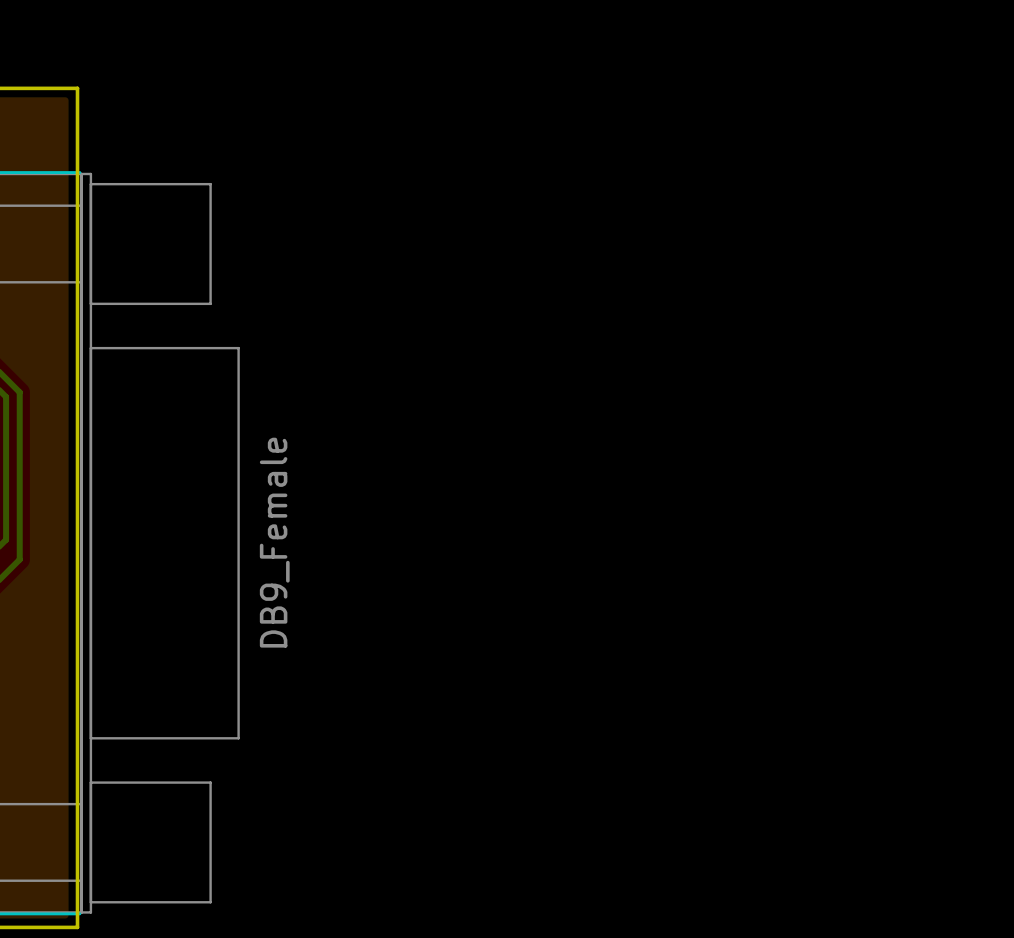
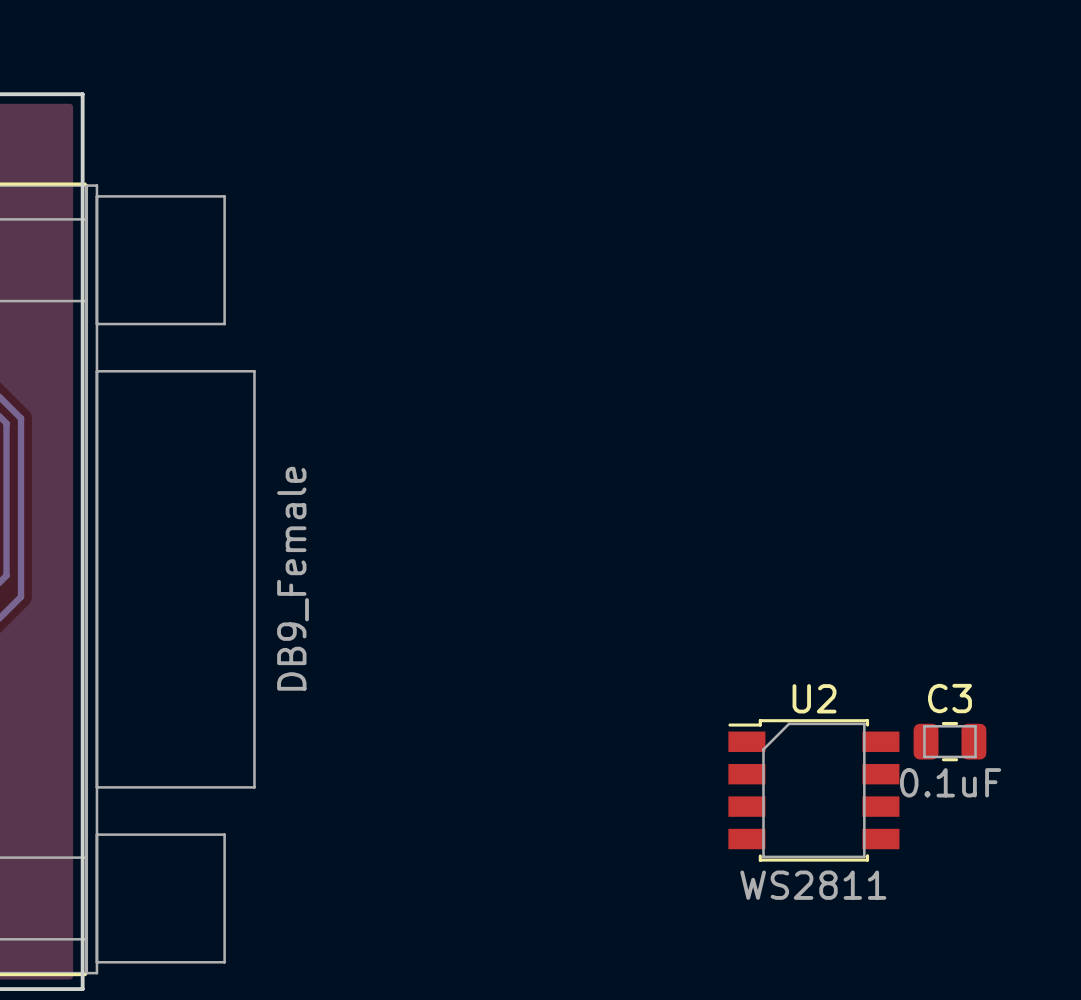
C3: none -> 0.1uF (949, 741)
U2: none -> WS2811 (813, 790)

